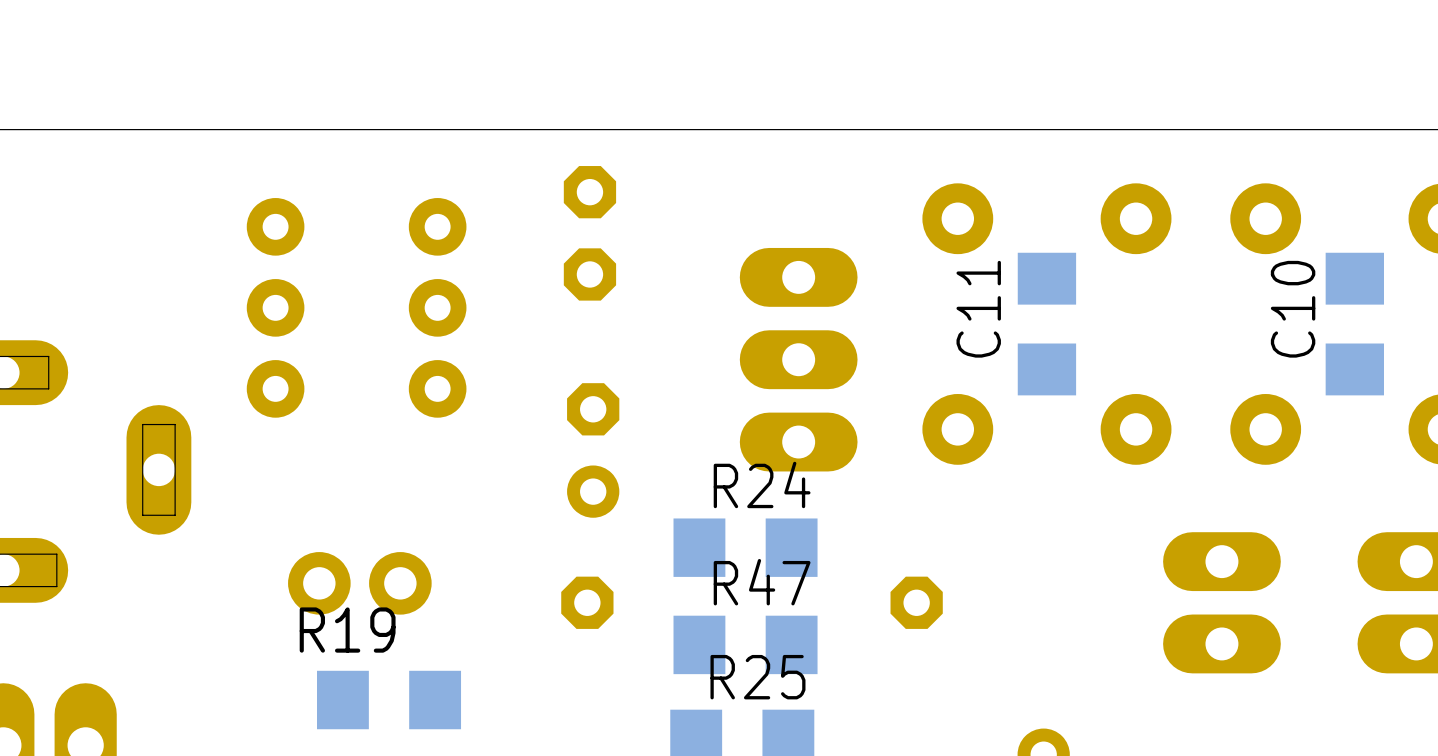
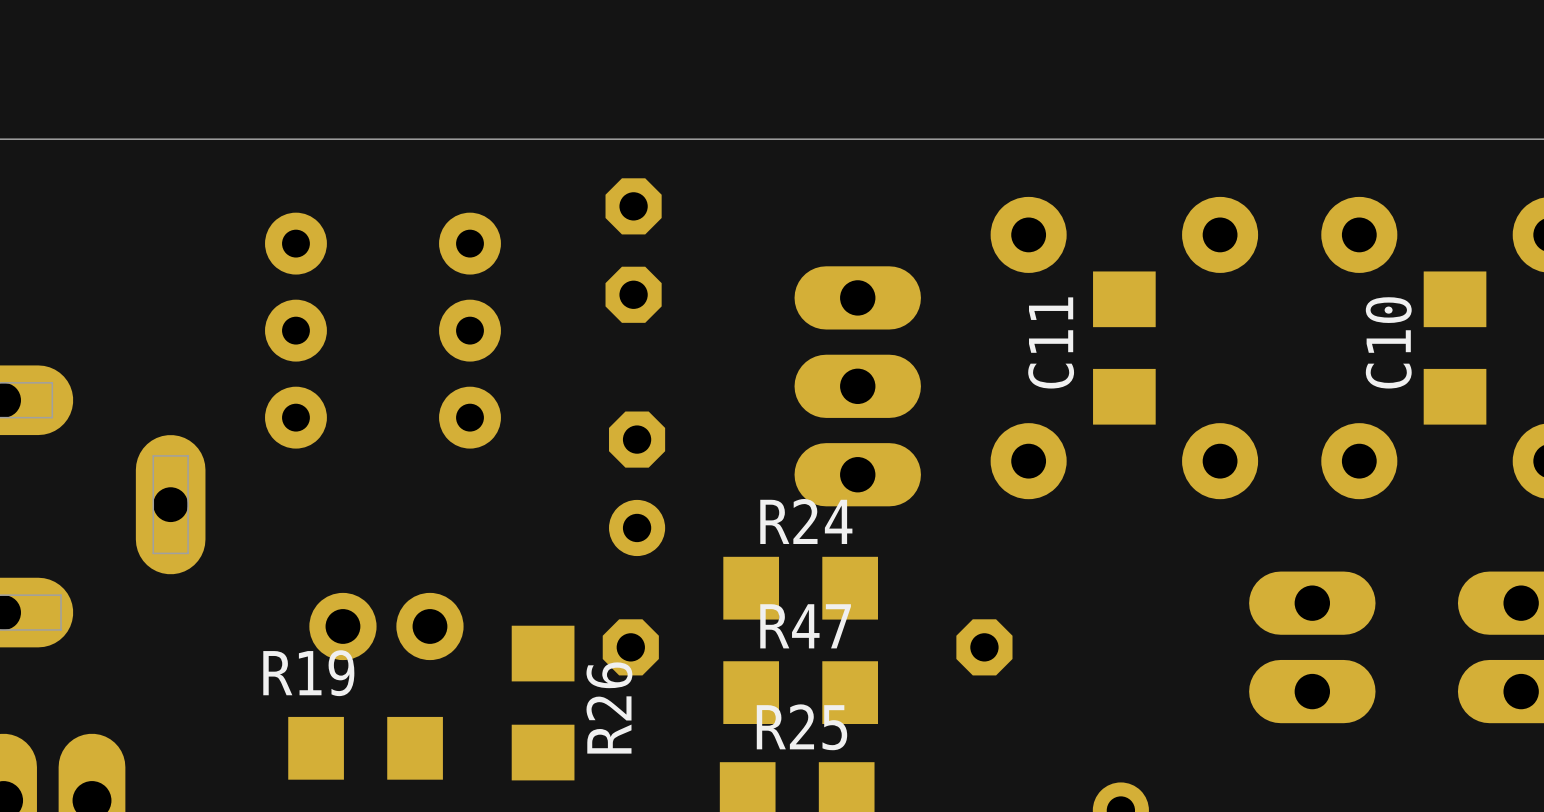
R26: none -> (543, 703)
R19 position: (389, 700) -> (365, 748)

